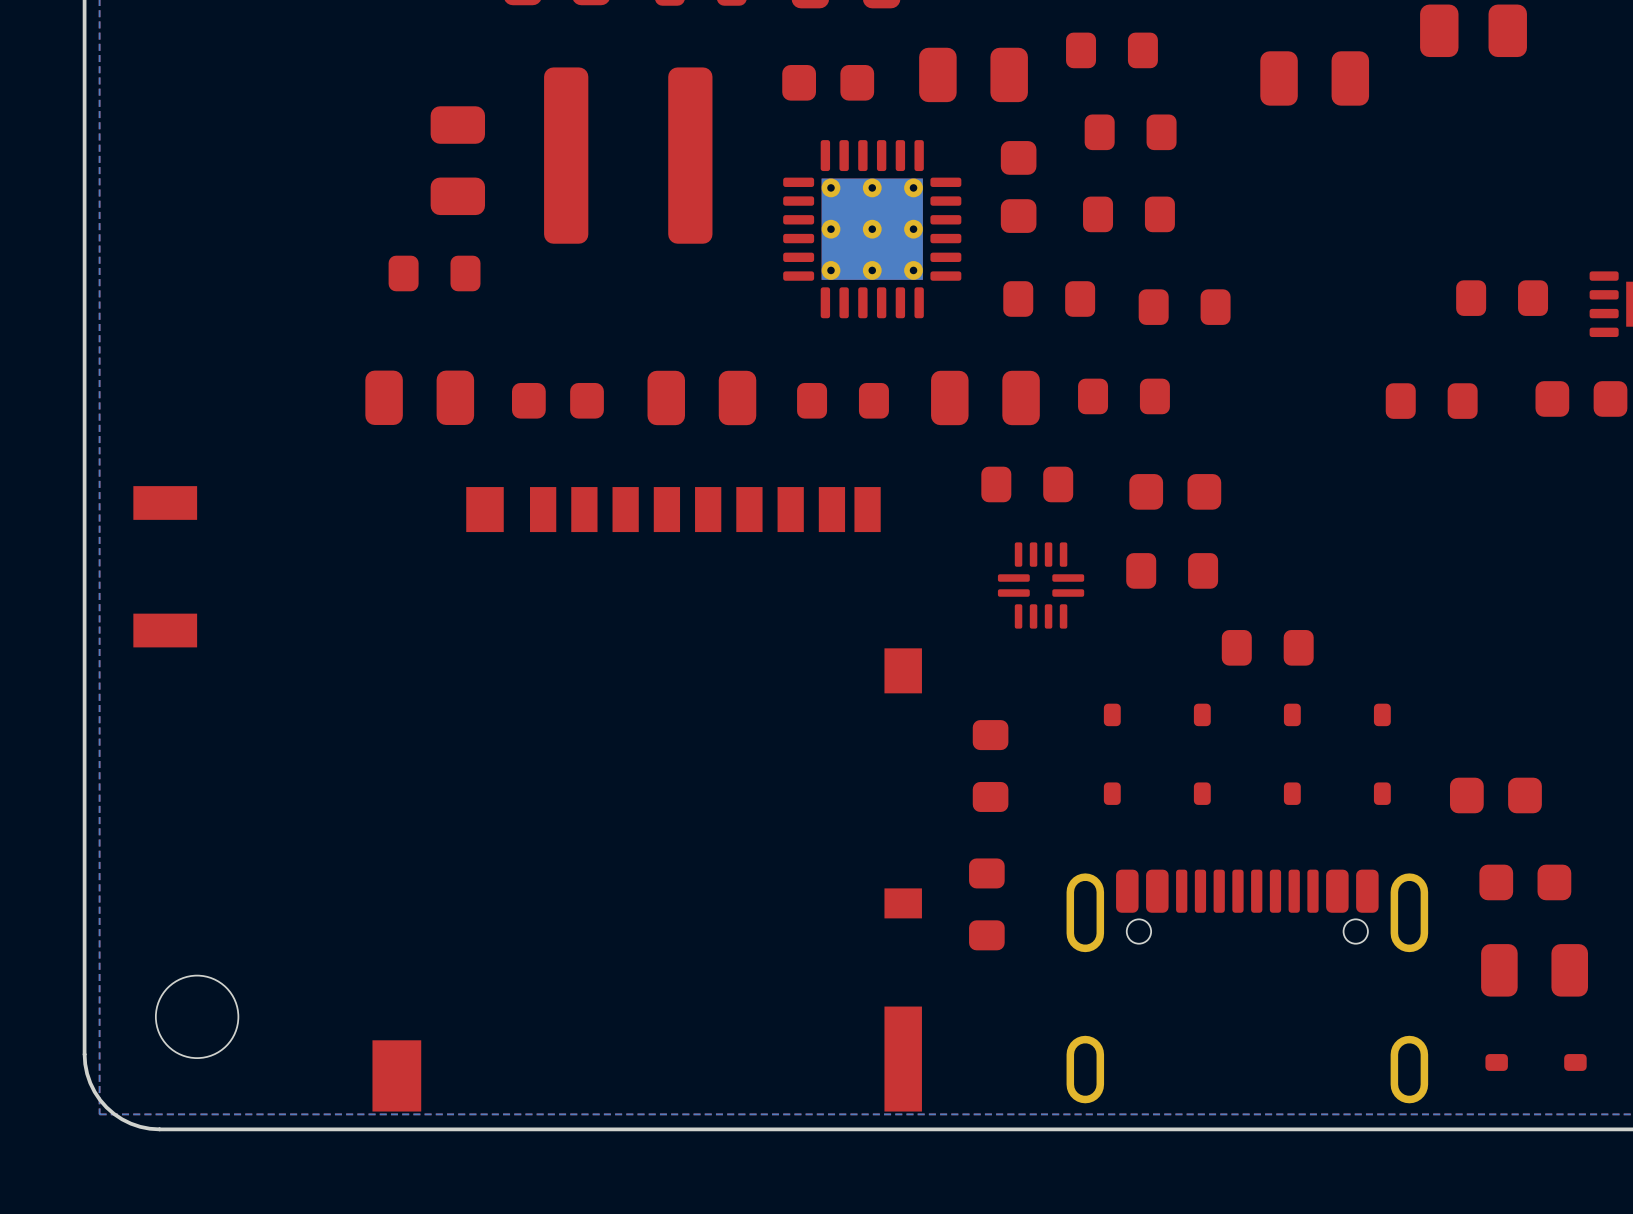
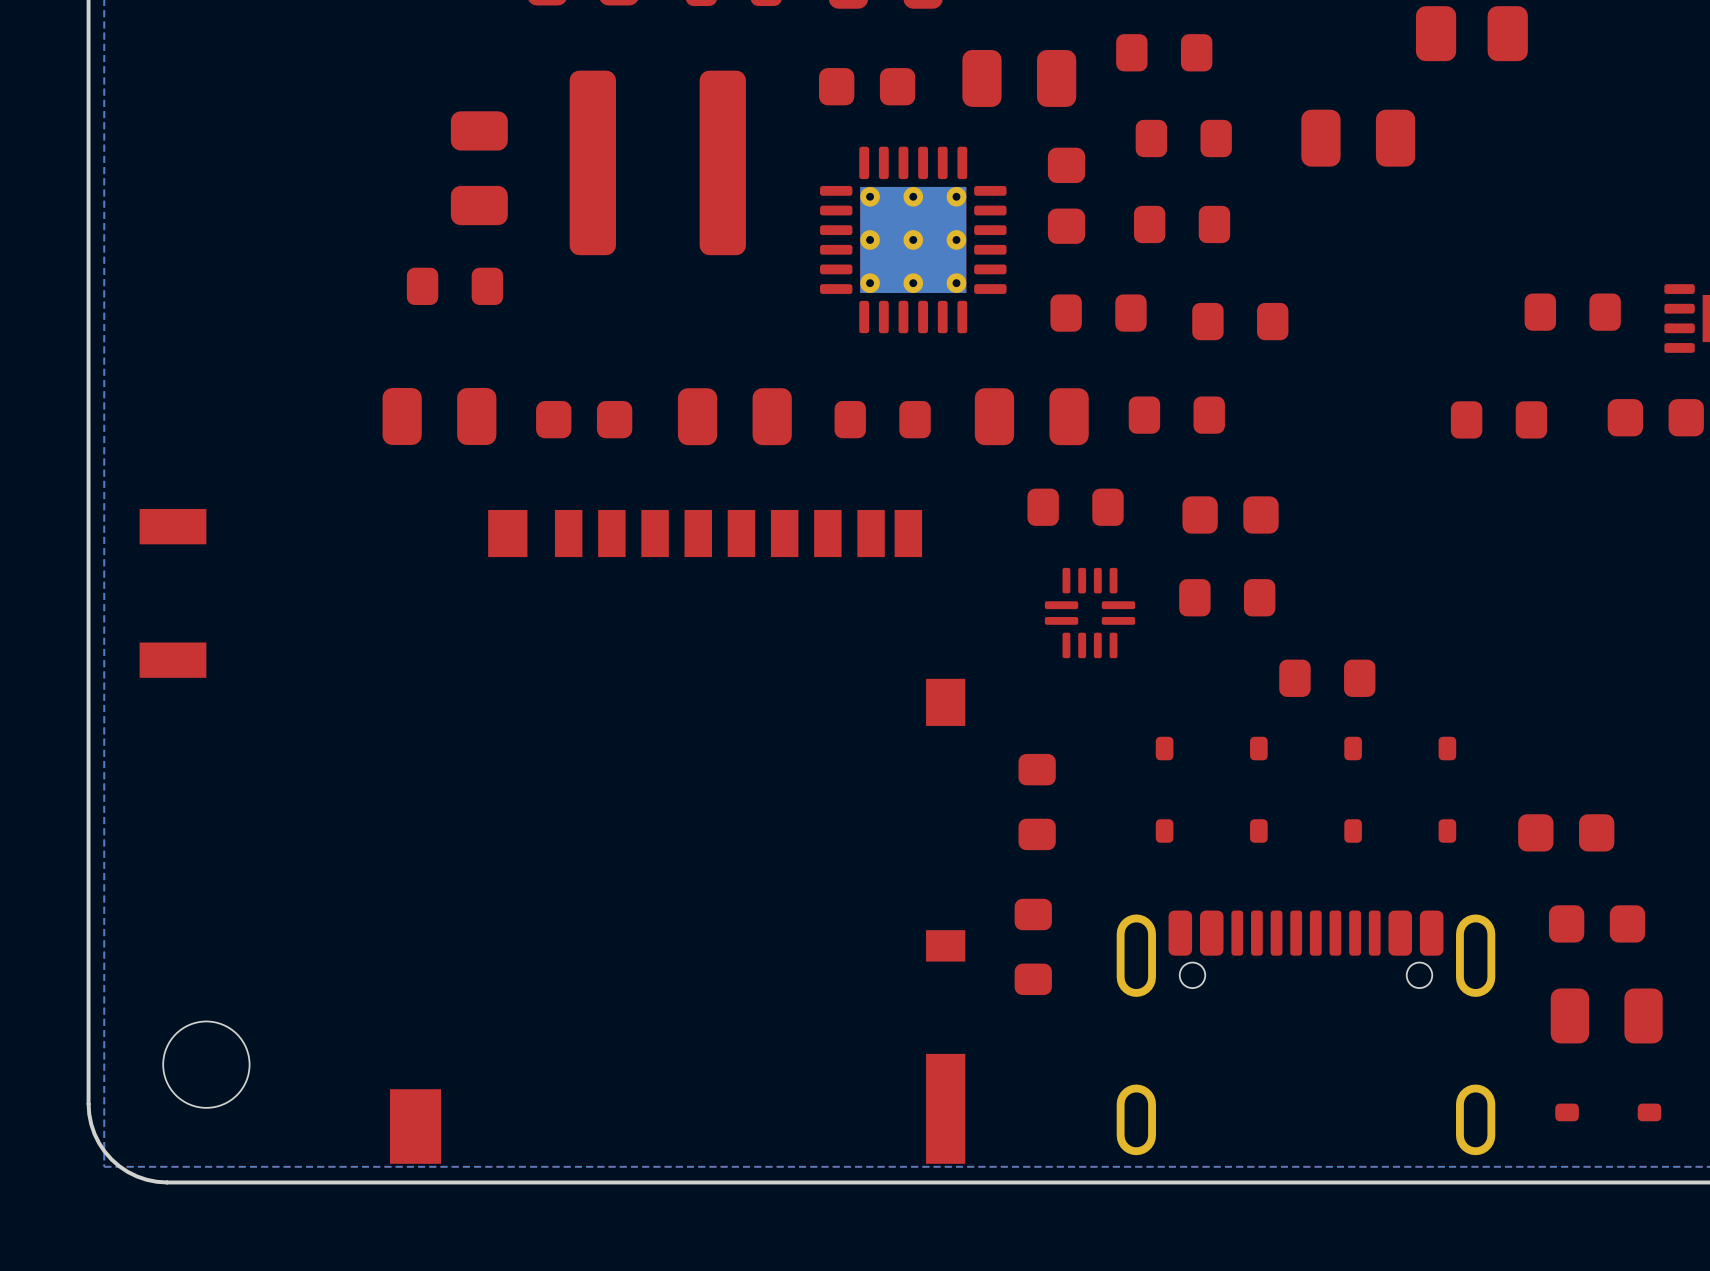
part position: (1473, 30) -> (1471, 33)
part position: (1314, 78) -> (1358, 138)

